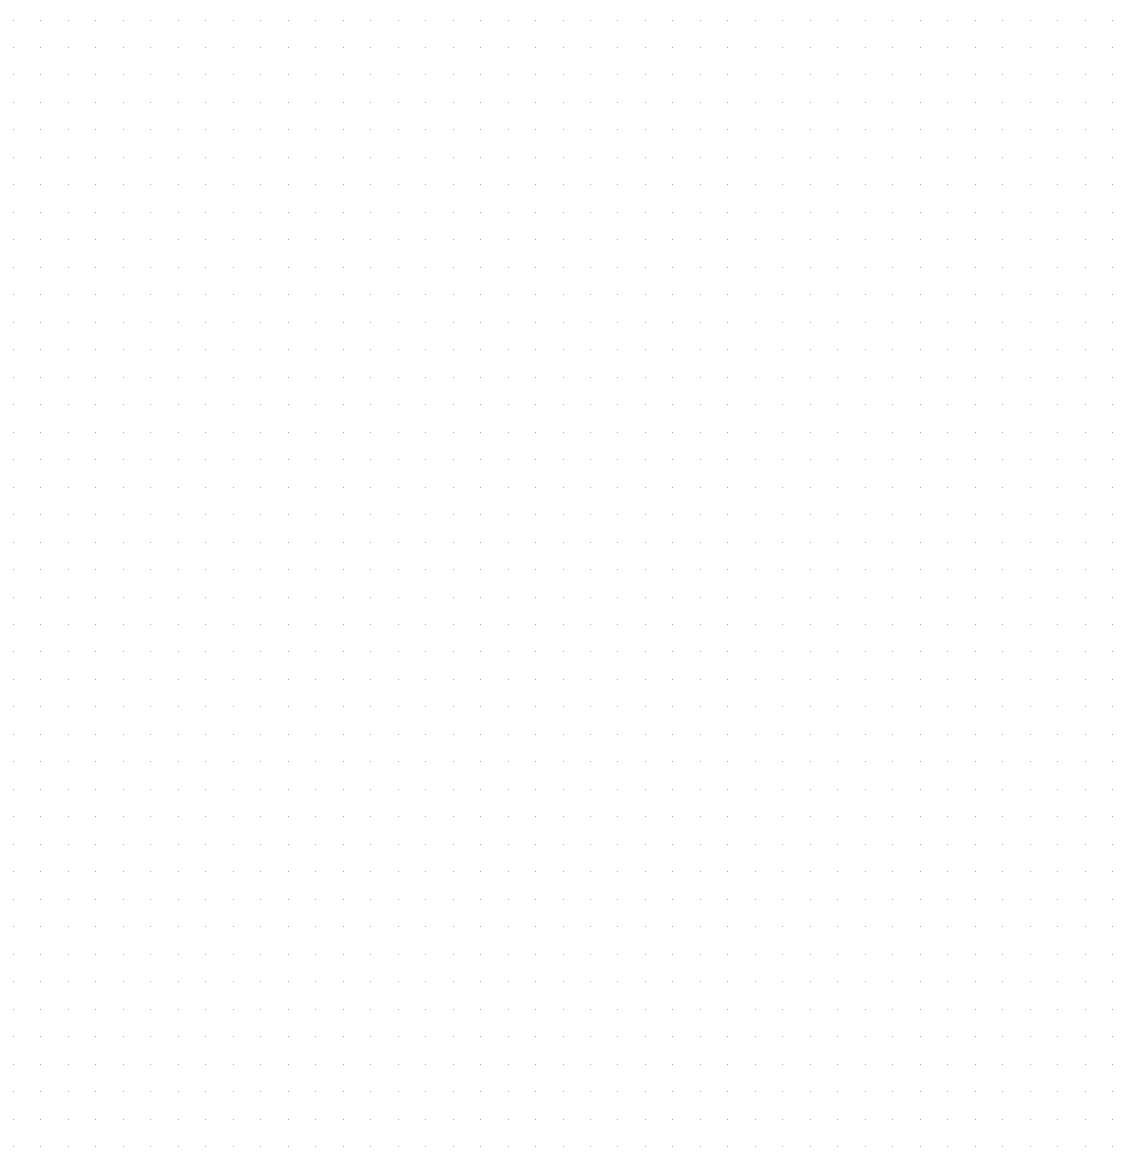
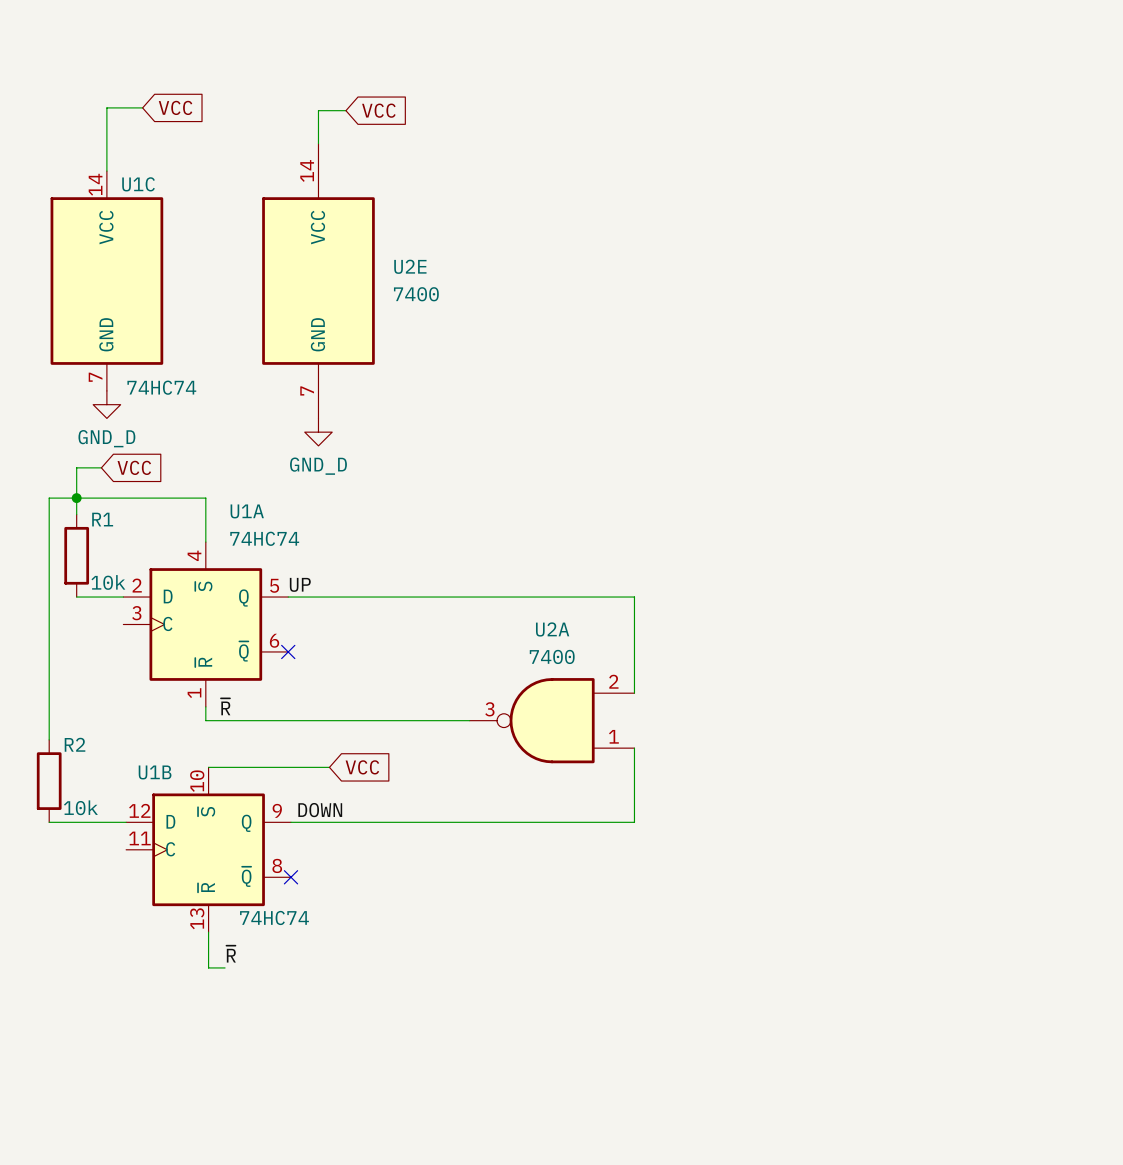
wire: none -> (142, 107) (106, 107) (106, 171)
global label: none -> VCC (175, 107)
wire: none -> (345, 110) (318, 110) (318, 143)
global label: none -> VCC (378, 110)
U1C: none -> 74HC74 (106, 281)
U2E: none -> 7400 (318, 281)
power symbol: none -> GND_D (106, 404)
power symbol: none -> GND_D (318, 432)
wire: none -> (101, 467) (76, 467) (76, 514)
global label: none -> VCC (134, 467)
junction: none -> (76, 498)
wire: none -> (205, 542) (205, 498) (49, 498) (49, 739)
R1: none -> 10k (76, 555)
label: none -> UP (300, 584)
wire: none -> (76, 597) (123, 597)
wire: none -> (288, 597) (634, 597) (634, 693)
U1A: none -> 74HC74 (205, 624)
no-connect mark: none -> (288, 651)
wire: none -> (205, 706) (205, 720) (469, 720)
label: none -> ~{R} (225, 706)
U2A: none -> 7400 (552, 720)
wire: none -> (634, 748) (634, 822) (291, 822)
wire: none -> (208, 767) (329, 767)
global label: none -> VCC (362, 767)
R2: none -> 10k (49, 781)
label: none -> DOWN (320, 810)
wire: none -> (49, 822) (126, 822)
U1B: none -> 74HC74 (208, 849)
no-connect mark: none -> (291, 877)
wire: none -> (208, 932) (208, 967) (225, 967)
label: none -> ~{R} (231, 954)

